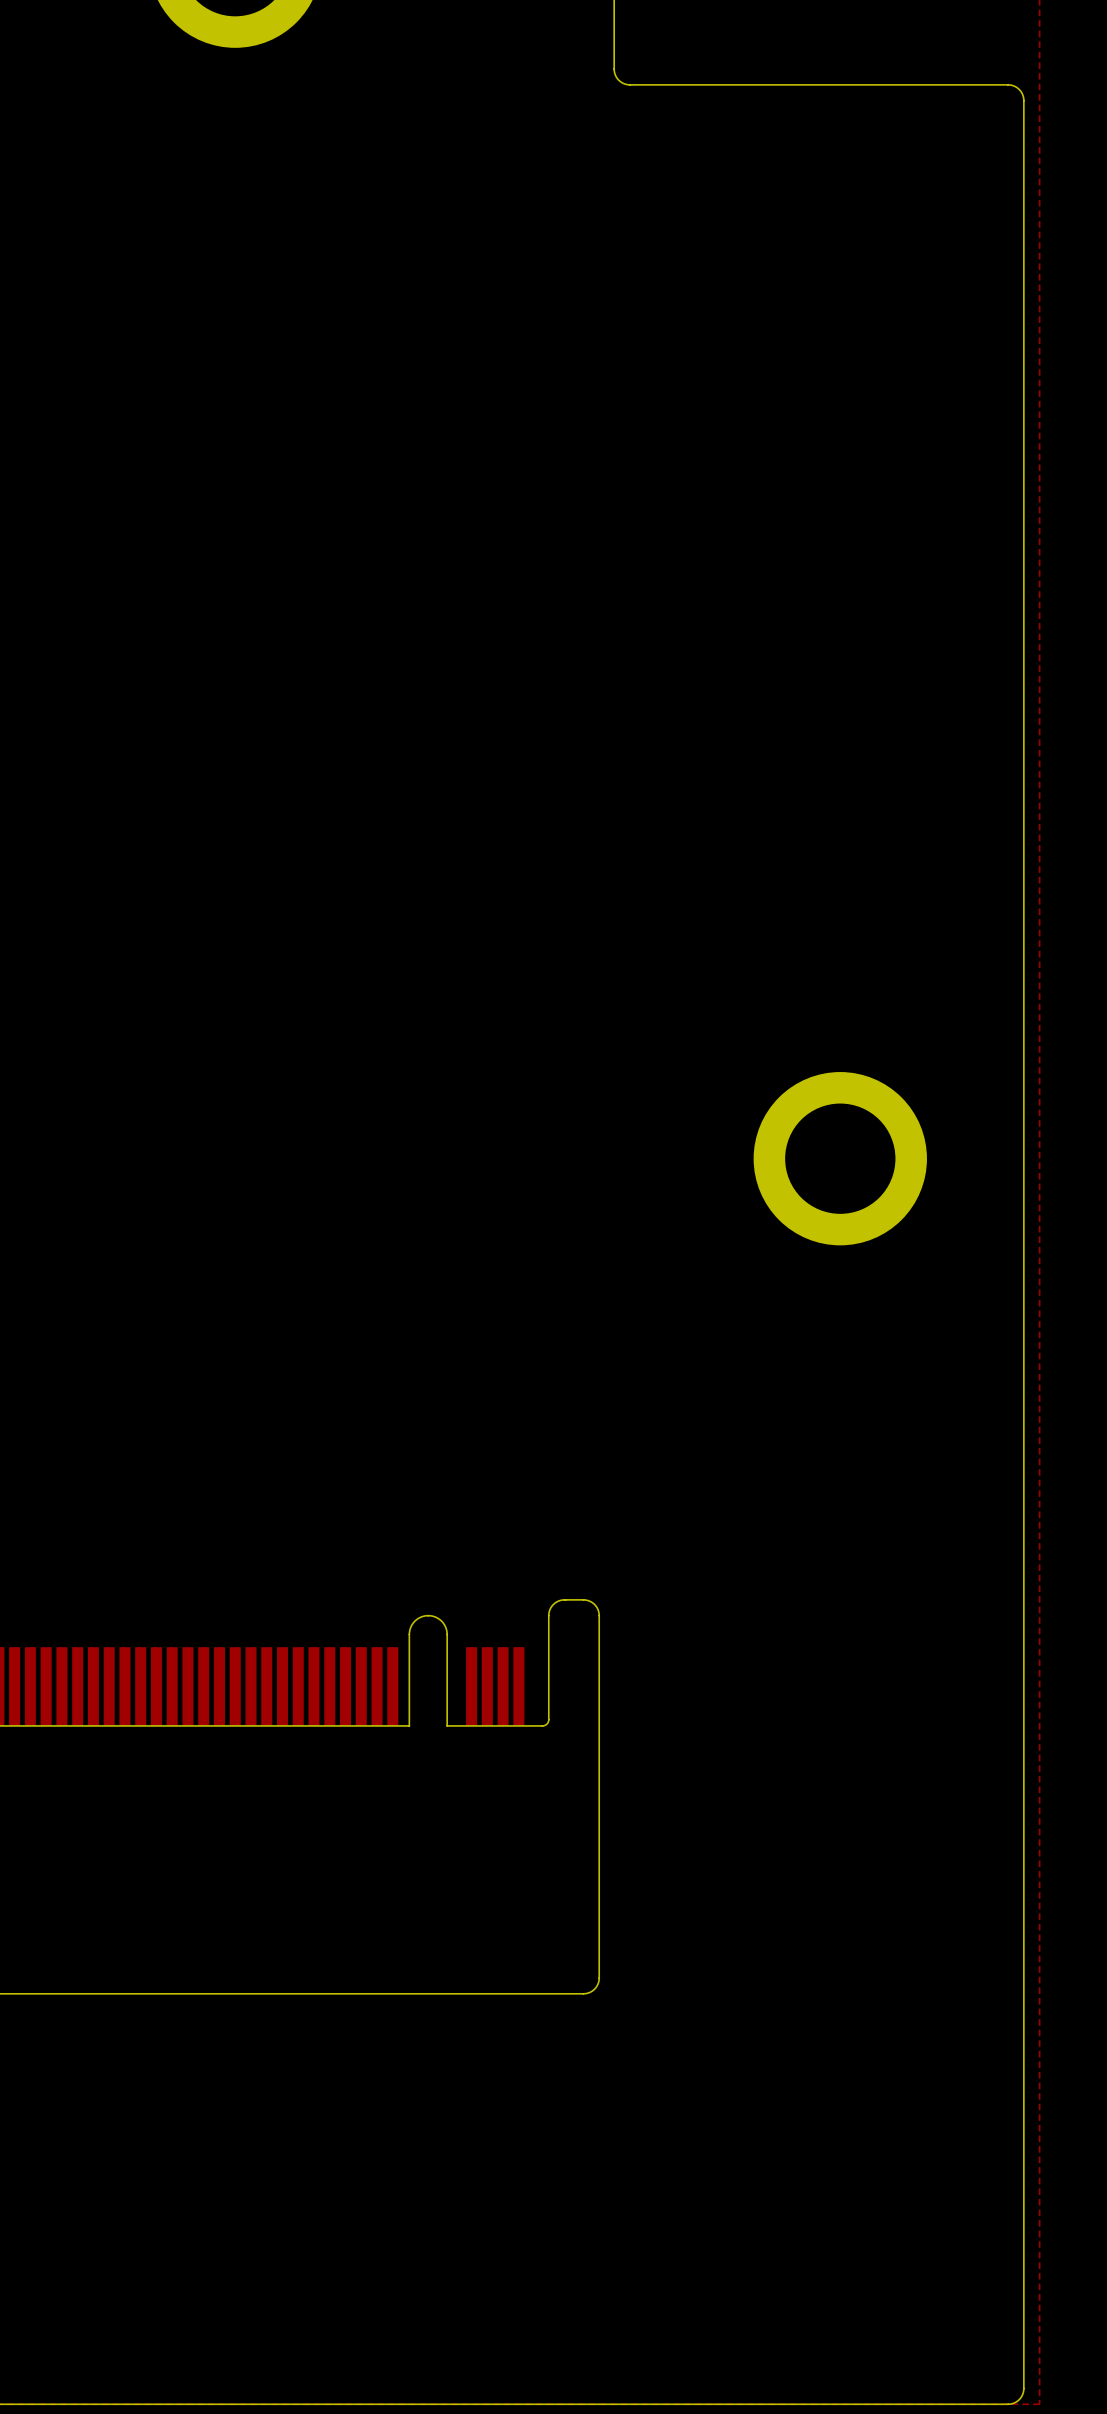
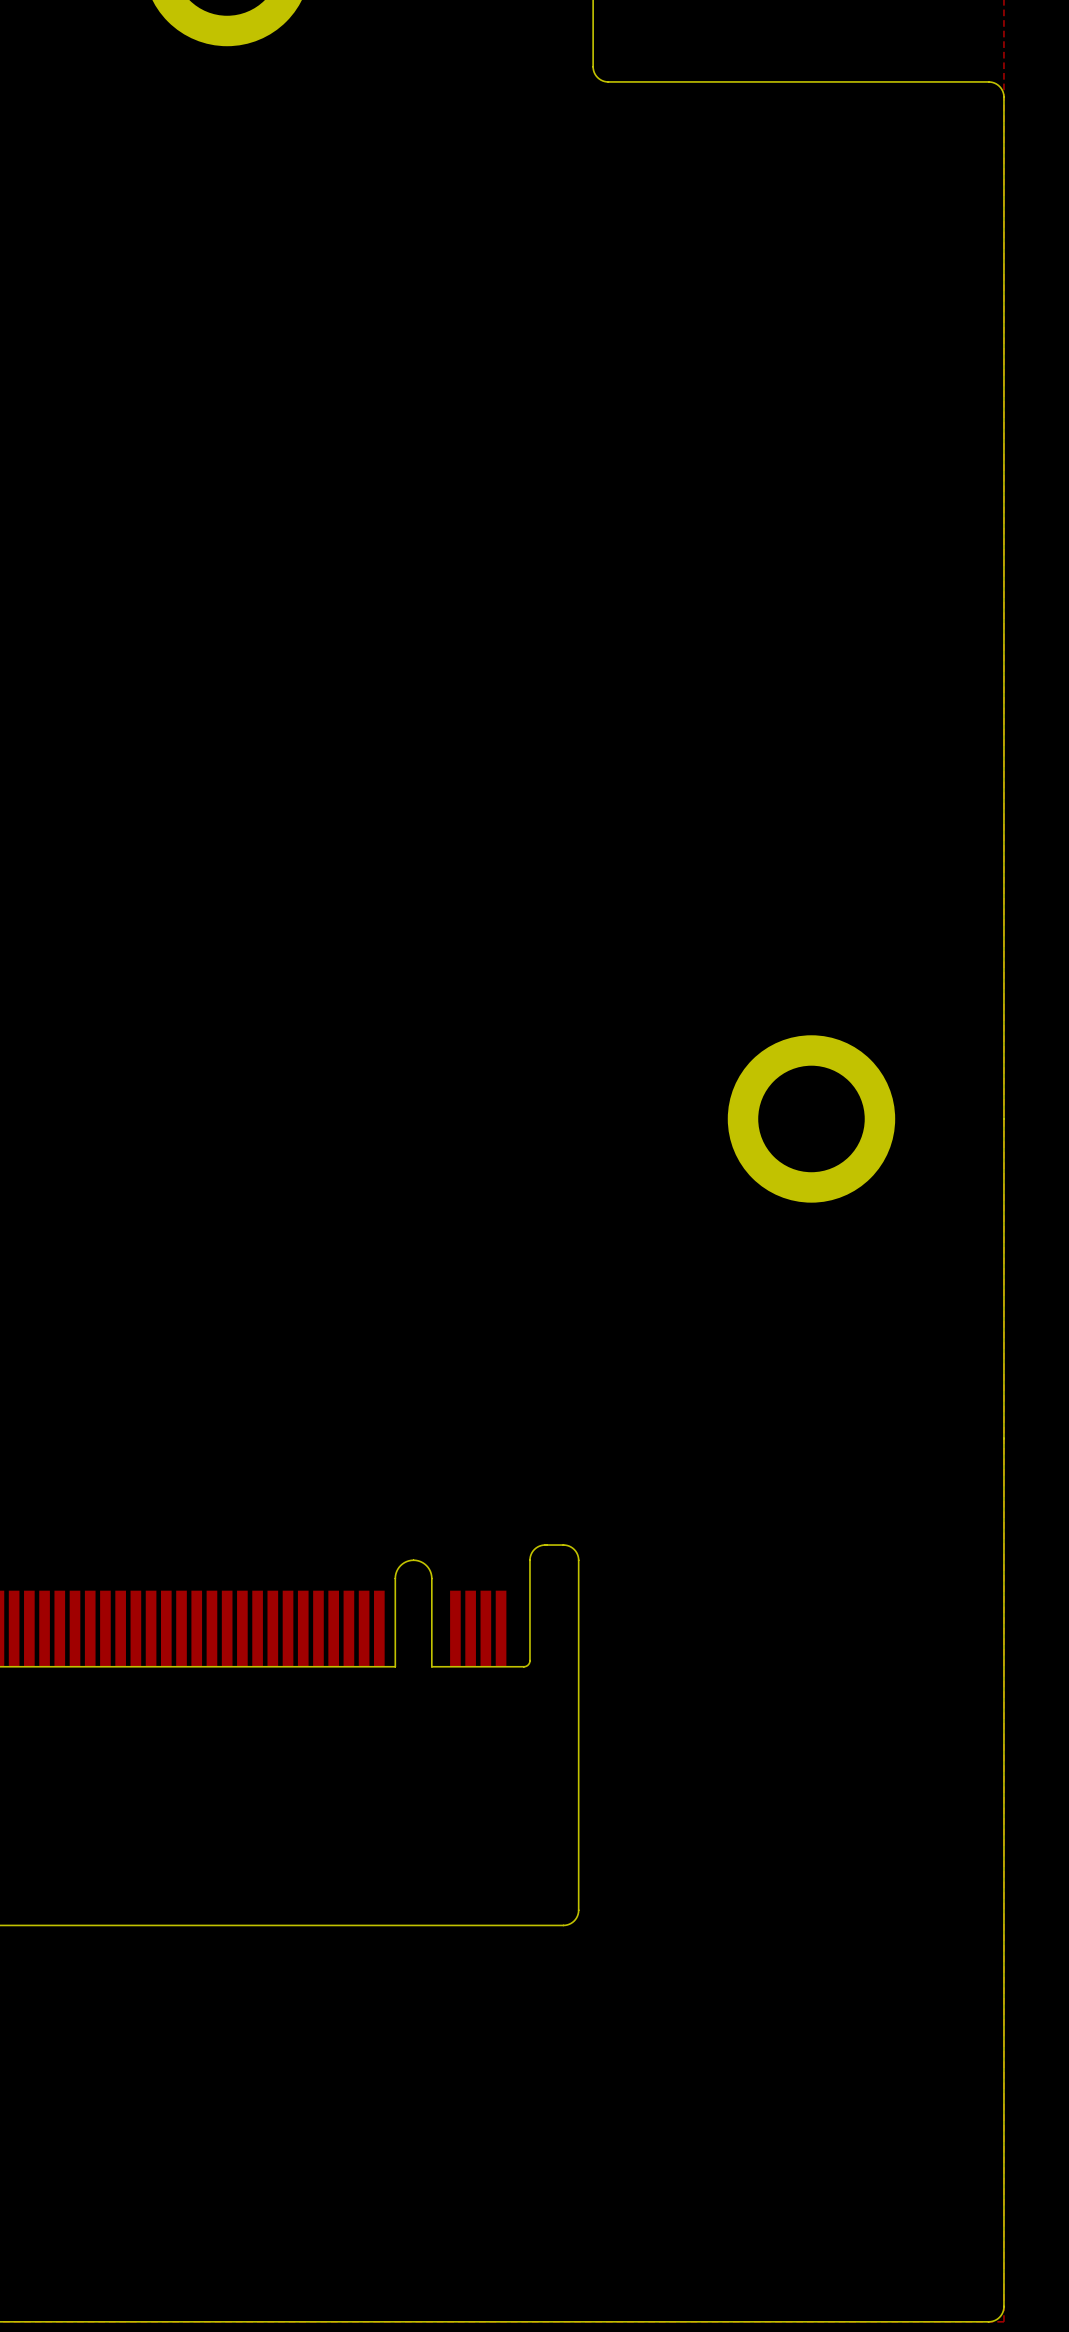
board edge: (1008, 84) (1019, 89) (1023, 100) (1023, 2388) (1019, 2399) (1008, 2404) -> (973, 81) (996, 84) (1001, 89) (1003, 97) (1003, 2306) (1001, 2314) (996, 2319) (973, 2321)

